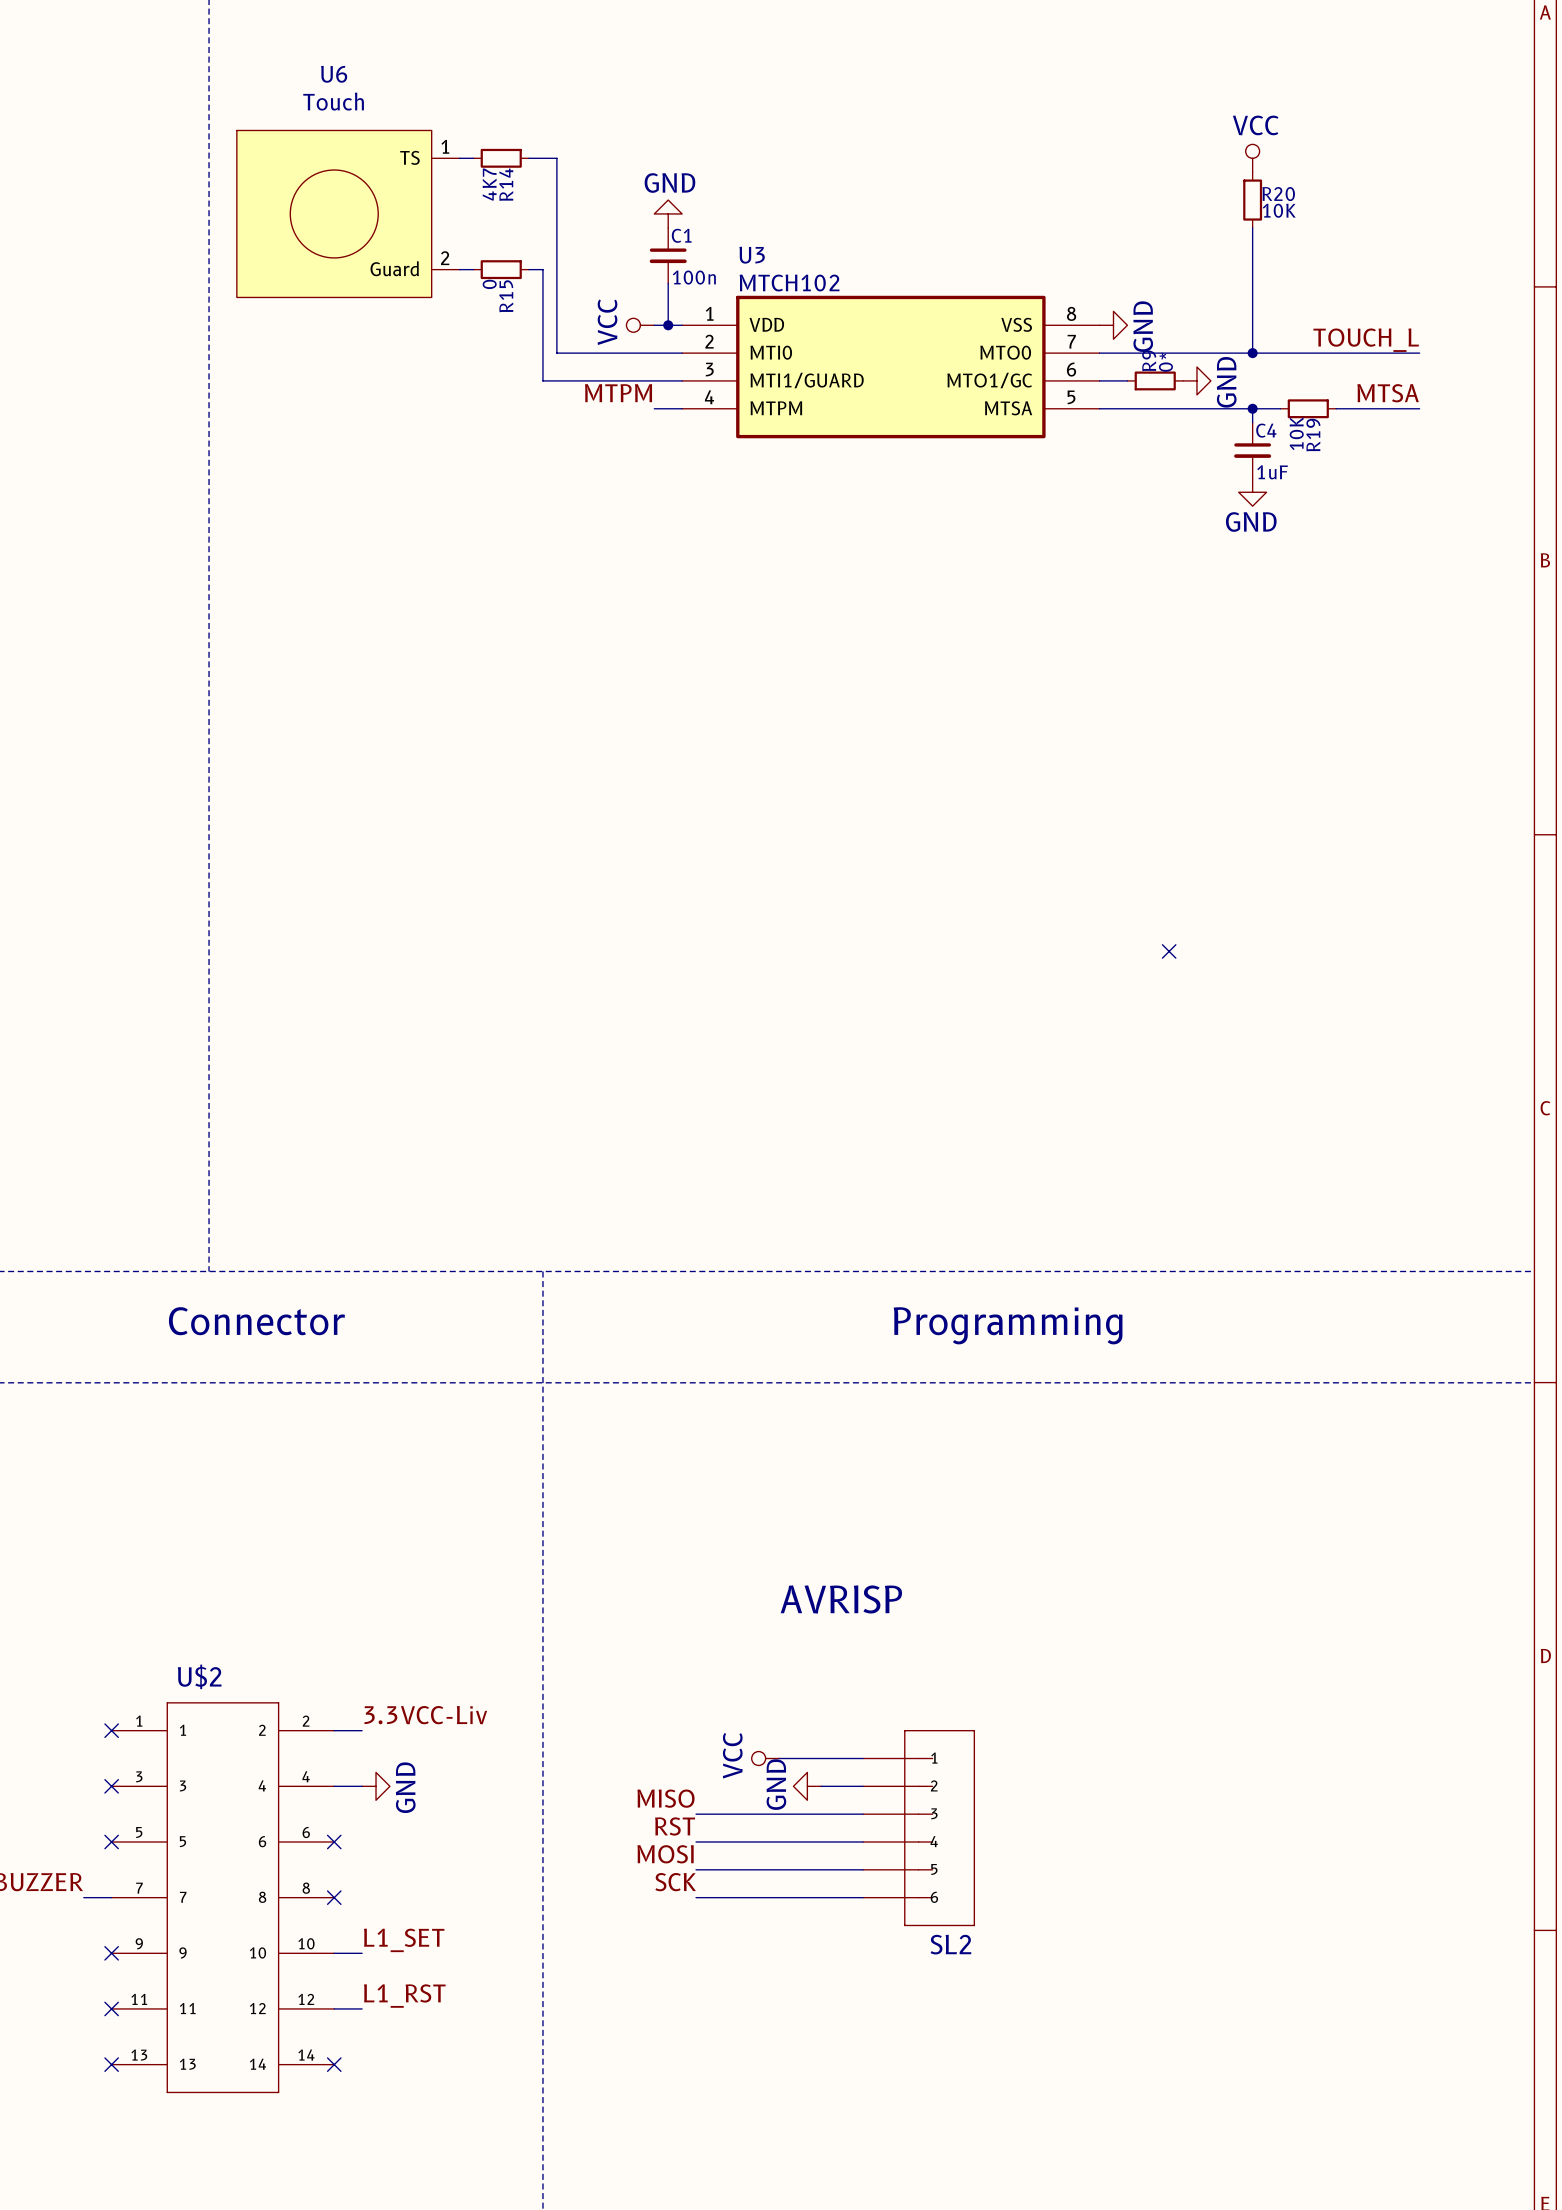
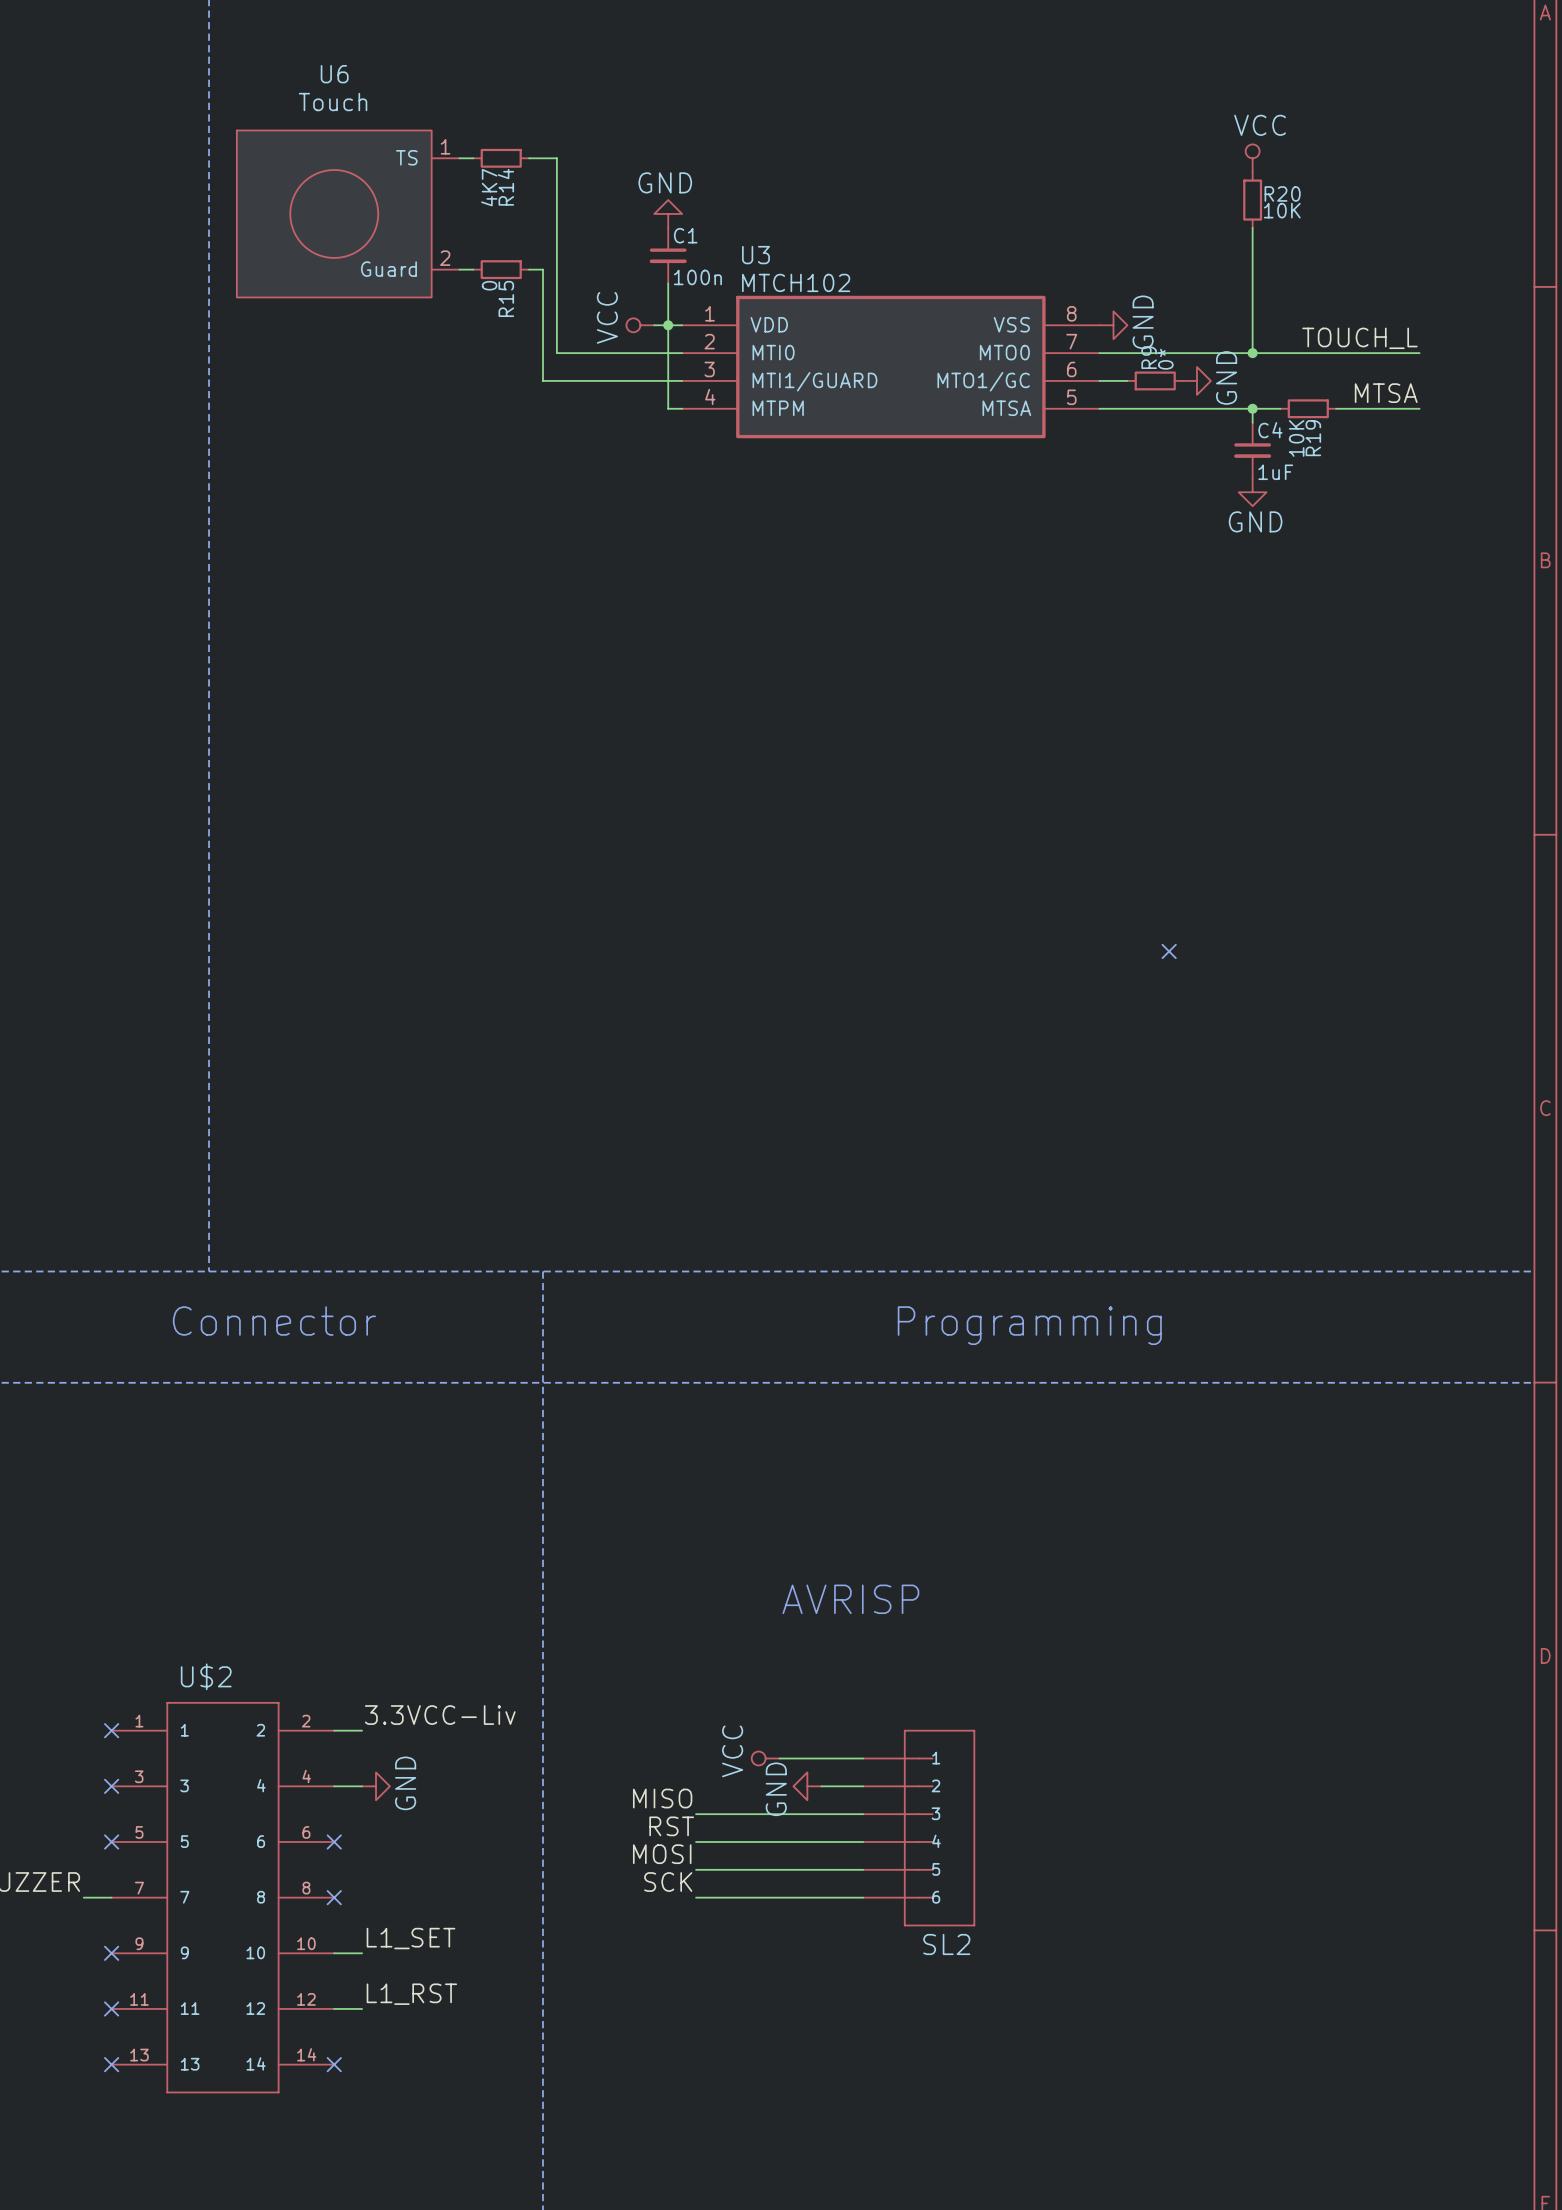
label: MTPM (618, 393) -> none
wire: (654, 408) (668, 408) -> (668, 325) (668, 408)

